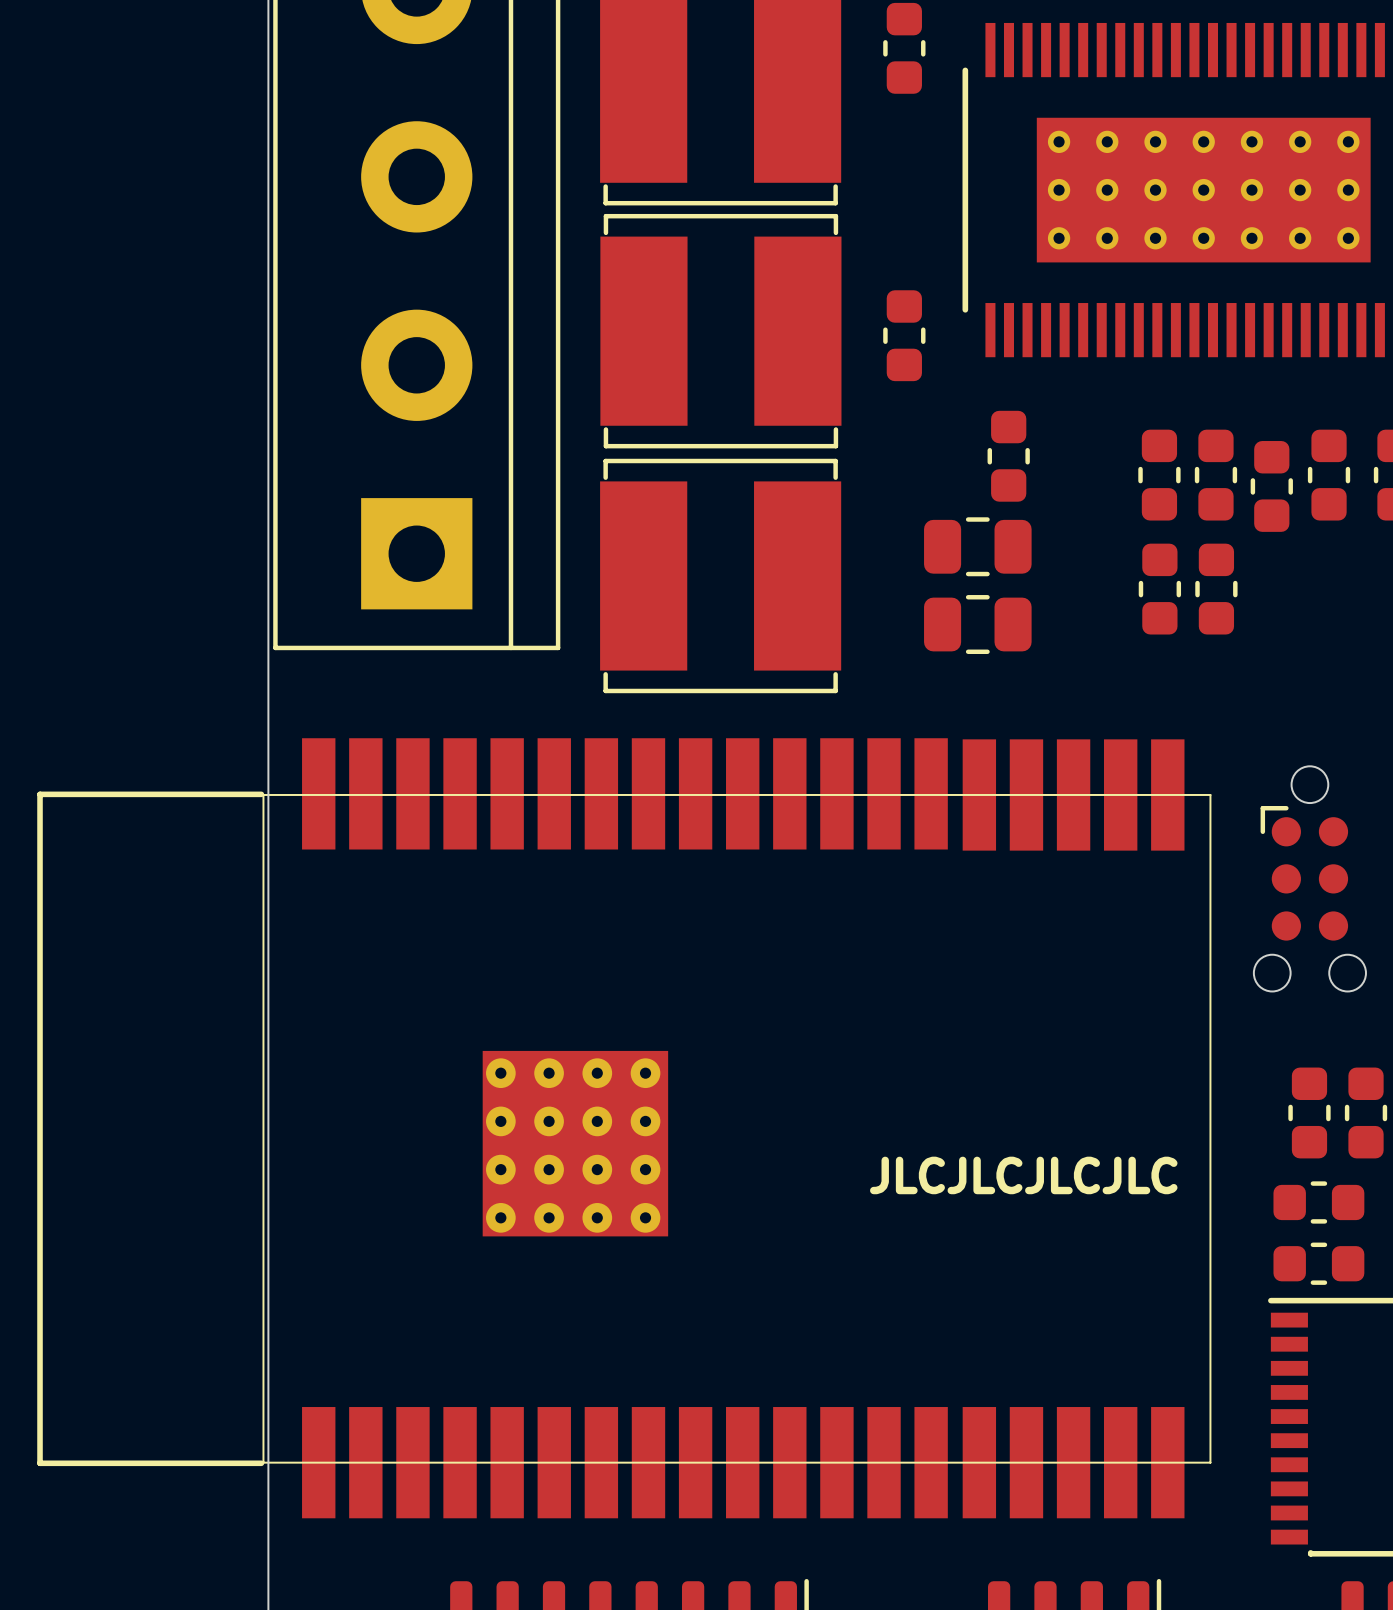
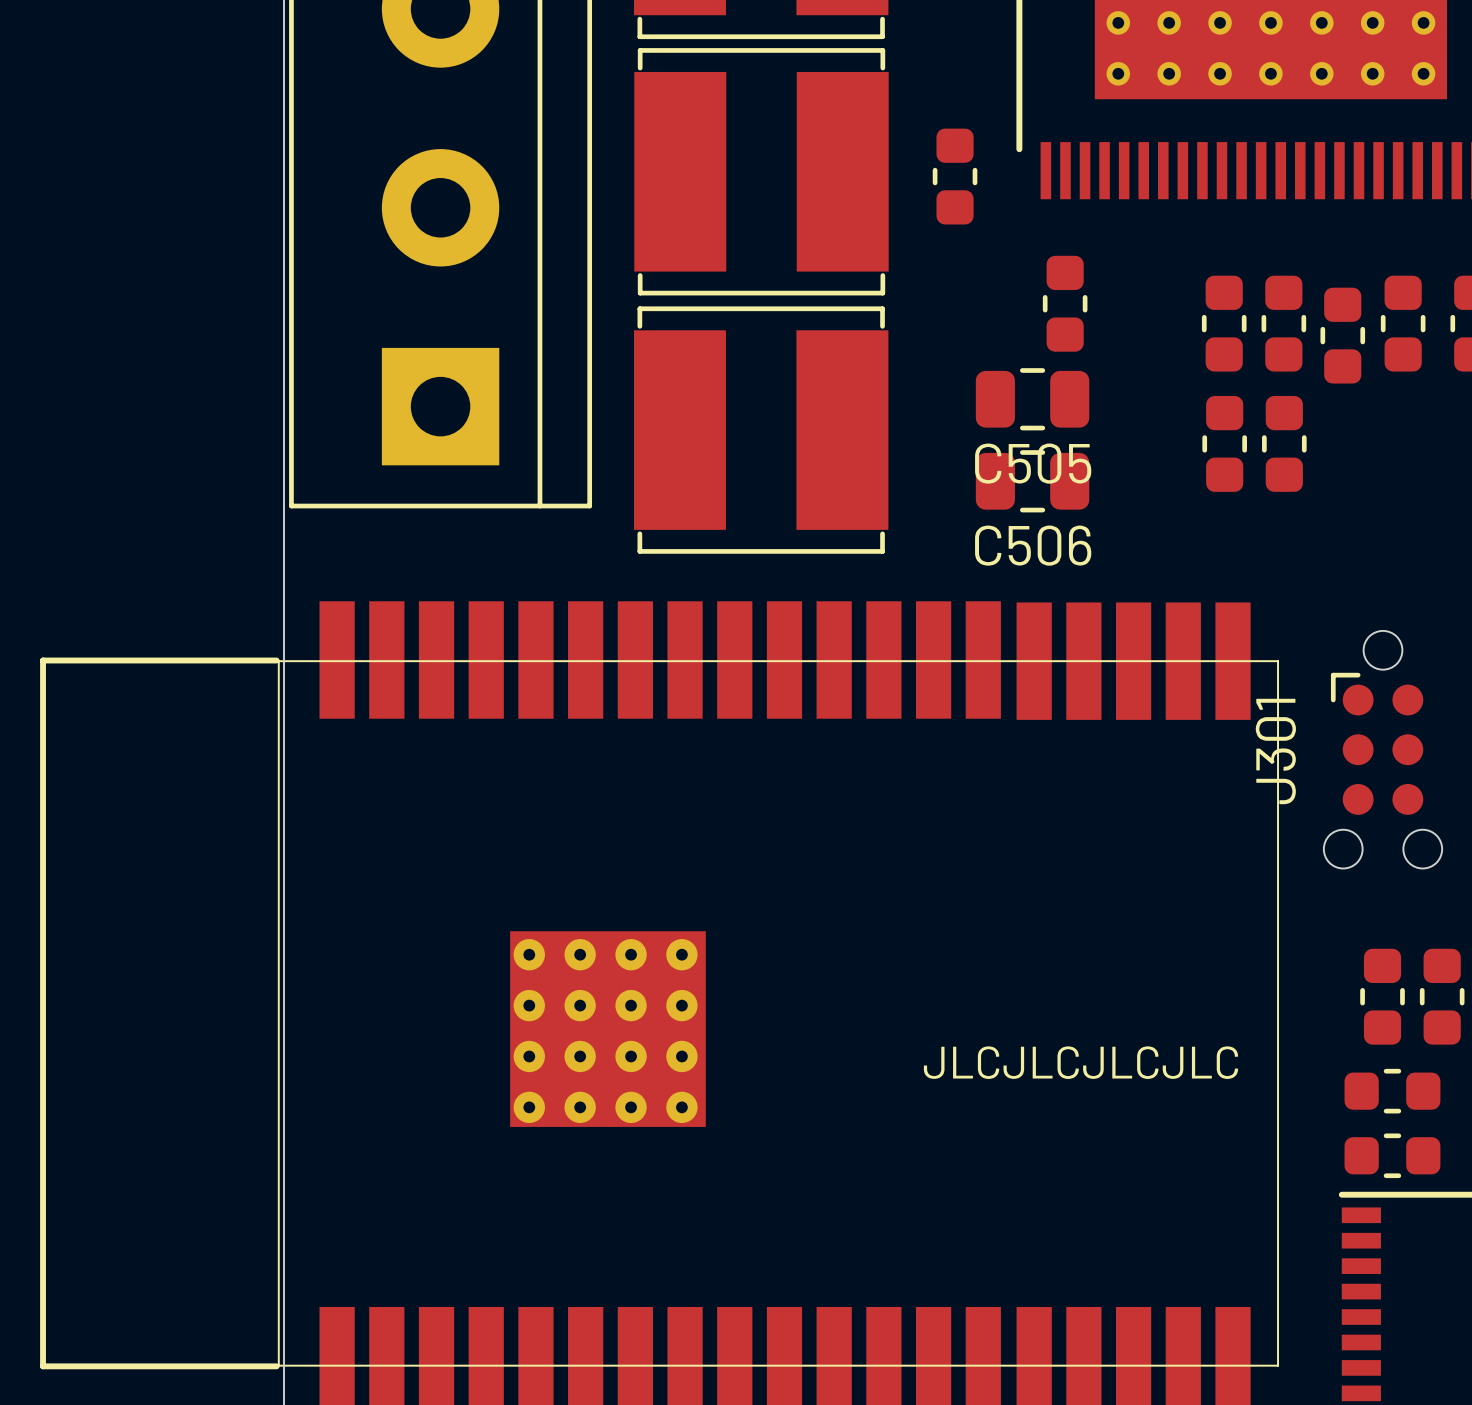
C505 name: none -> C505 (1033, 463)
C506 name: none -> C506 (1033, 545)
J301 name: none -> J301 (1275, 751)

